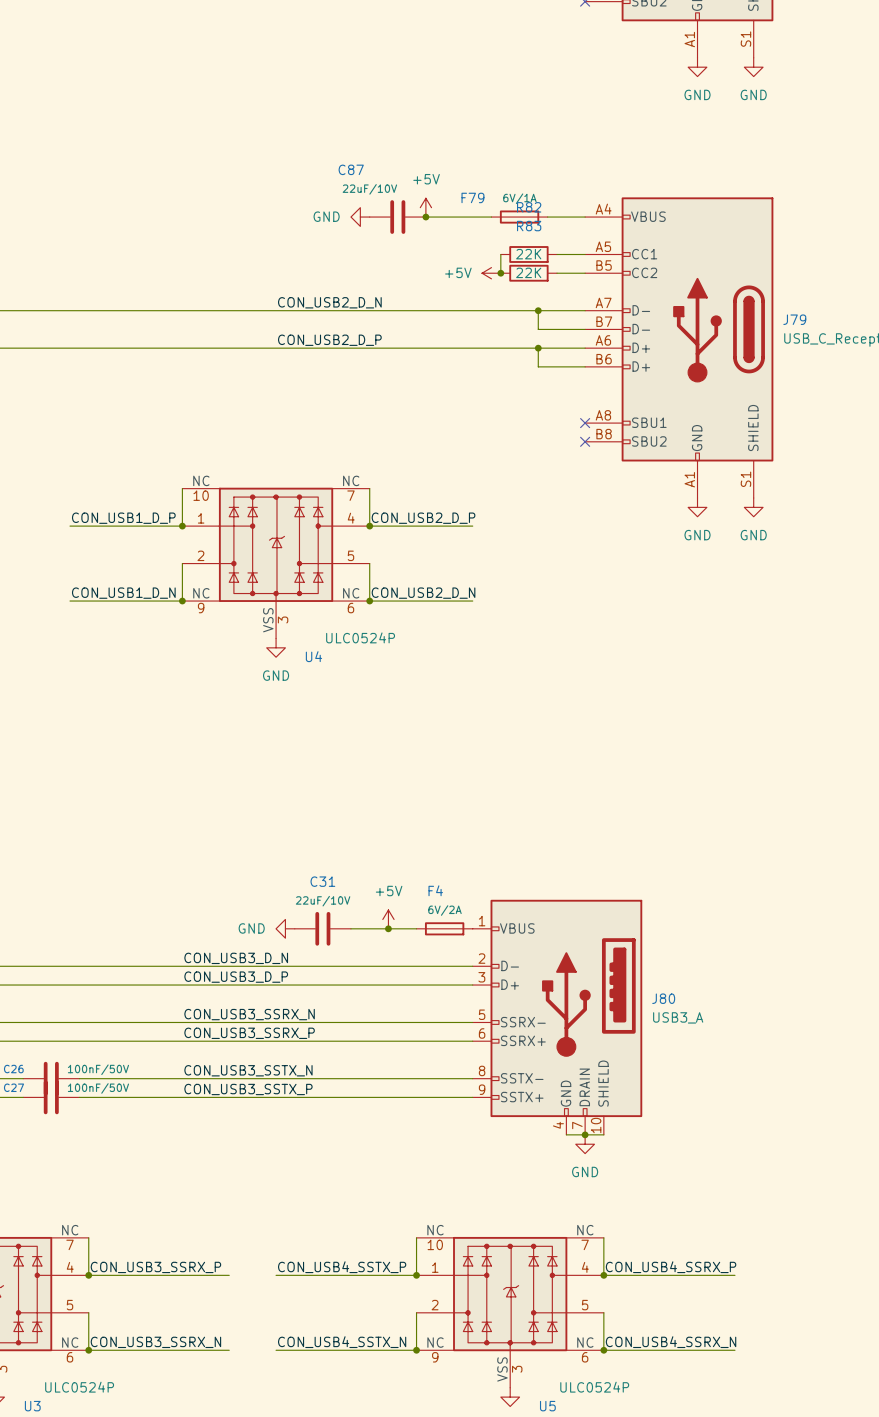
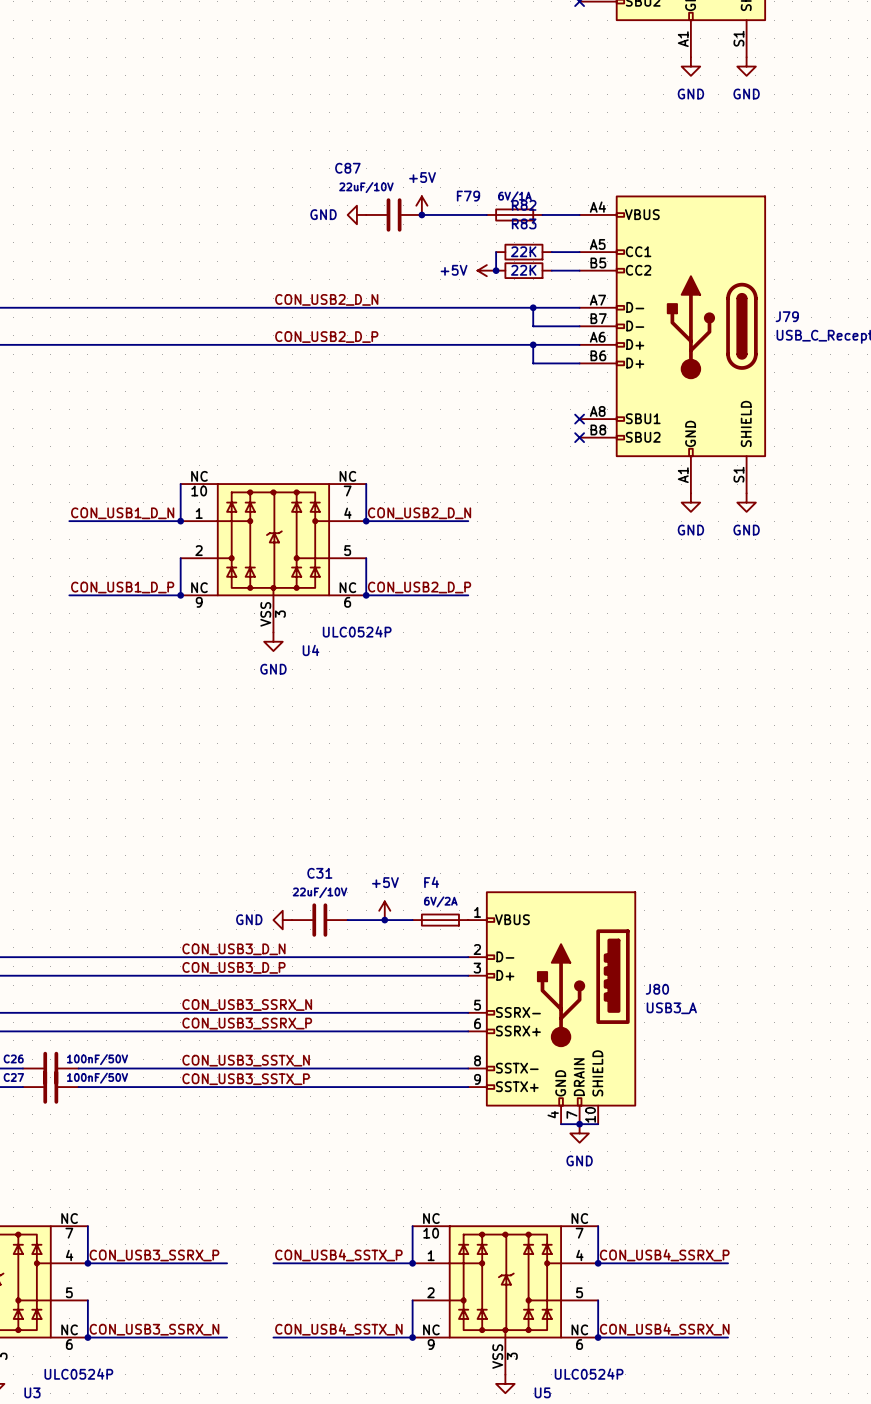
label: CON_USB1_D_P (123, 518) -> CON_USB1_D_N (122, 513)
label: CON_USB2_D_P (423, 518) -> CON_USB2_D_N (419, 513)
label: CON_USB1_D_N (123, 593) -> CON_USB1_D_P (122, 587)
label: CON_USB2_D_N (423, 593) -> CON_USB2_D_P (419, 587)

